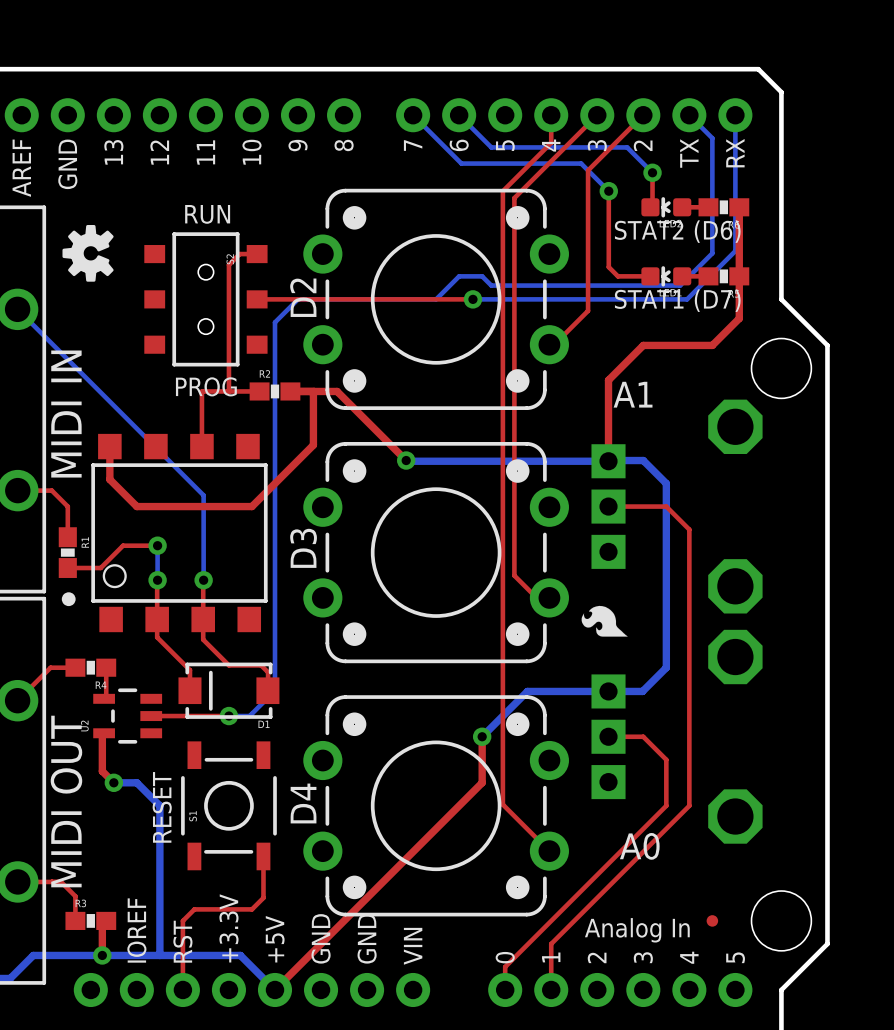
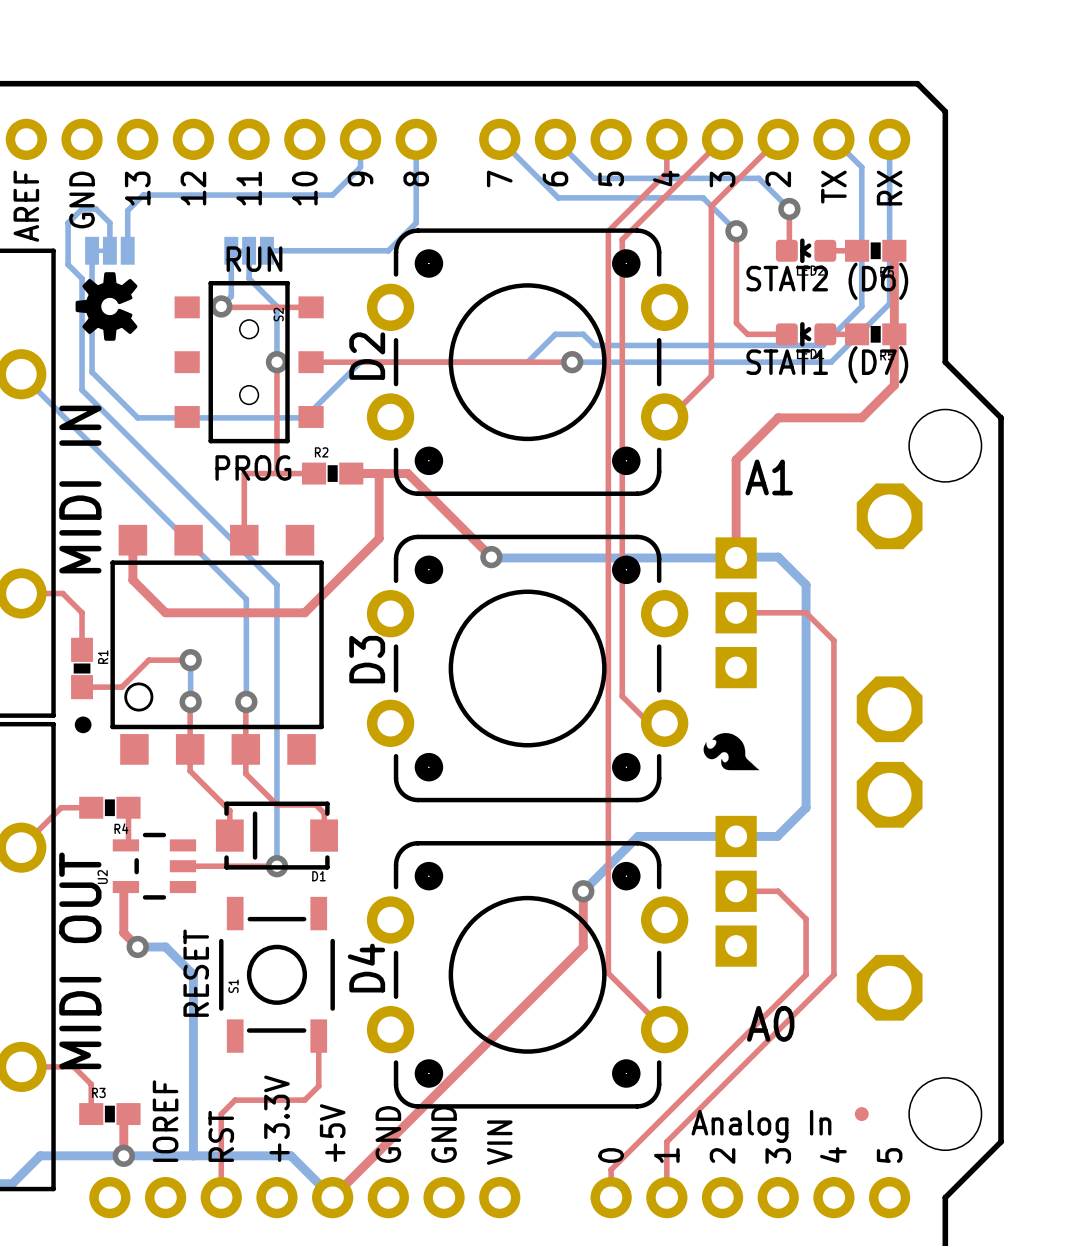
bottom track: none -> (360, 139) (360, 167) (332, 195) (143, 195) (127, 210) (127, 250)
bottom track: none -> (416, 139) (416, 222) (388, 250) (266, 250)
bottom track: none -> (92, 250) (92, 372) (137, 417) (304, 417) (332, 390)
part: none -> (109, 250)
bottom track: none -> (231, 250) (231, 296) (221, 306)
bottom track: none -> (249, 250) (249, 278) (276, 306) (276, 362)
part: none -> (249, 250)
via: none -> (221, 306)
top track: (239, 254) (228, 264) (228, 299) -> (290, 307) (221, 306)
via: none -> (276, 362)
bottom track: (274, 322) (274, 690) (249, 716) (228, 716) -> (109, 250) (109, 222) (95, 209) (82, 209) (68, 222) (68, 264) (82, 278) (82, 390) (276, 584) (276, 866)

